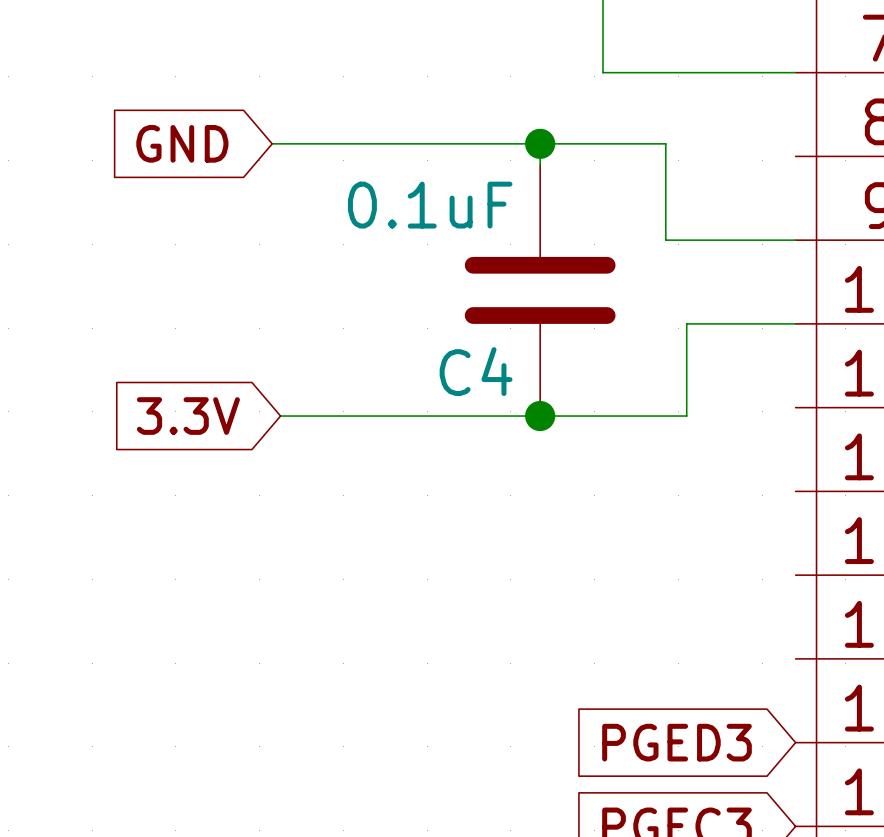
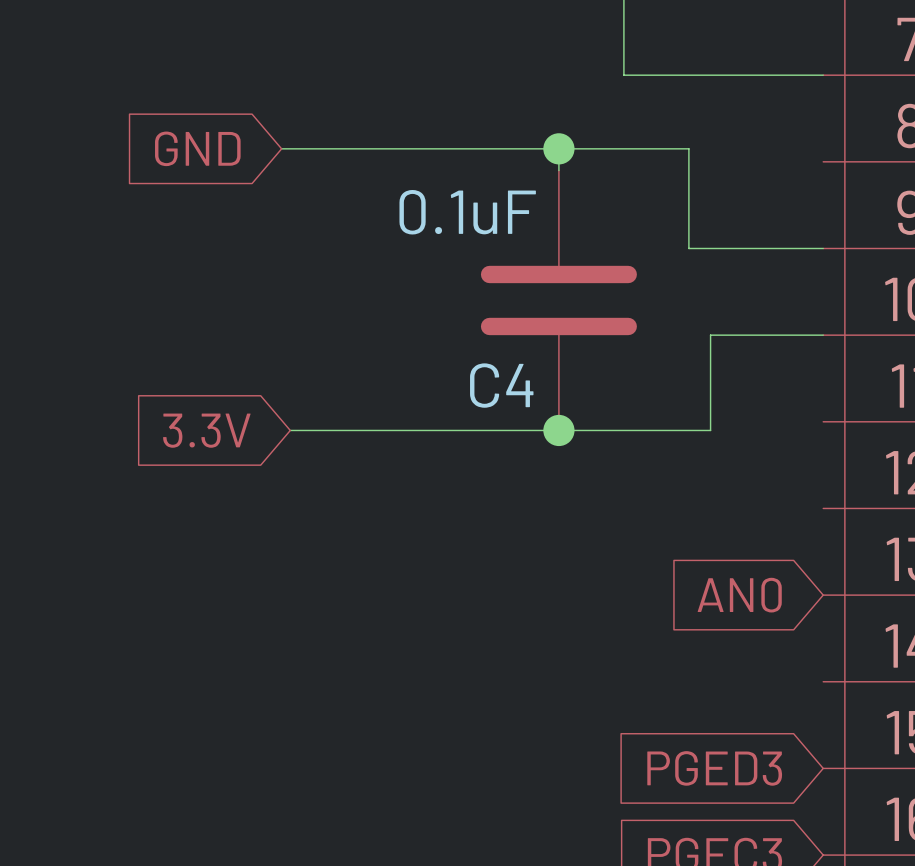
global label: none -> AN0 (739, 595)

